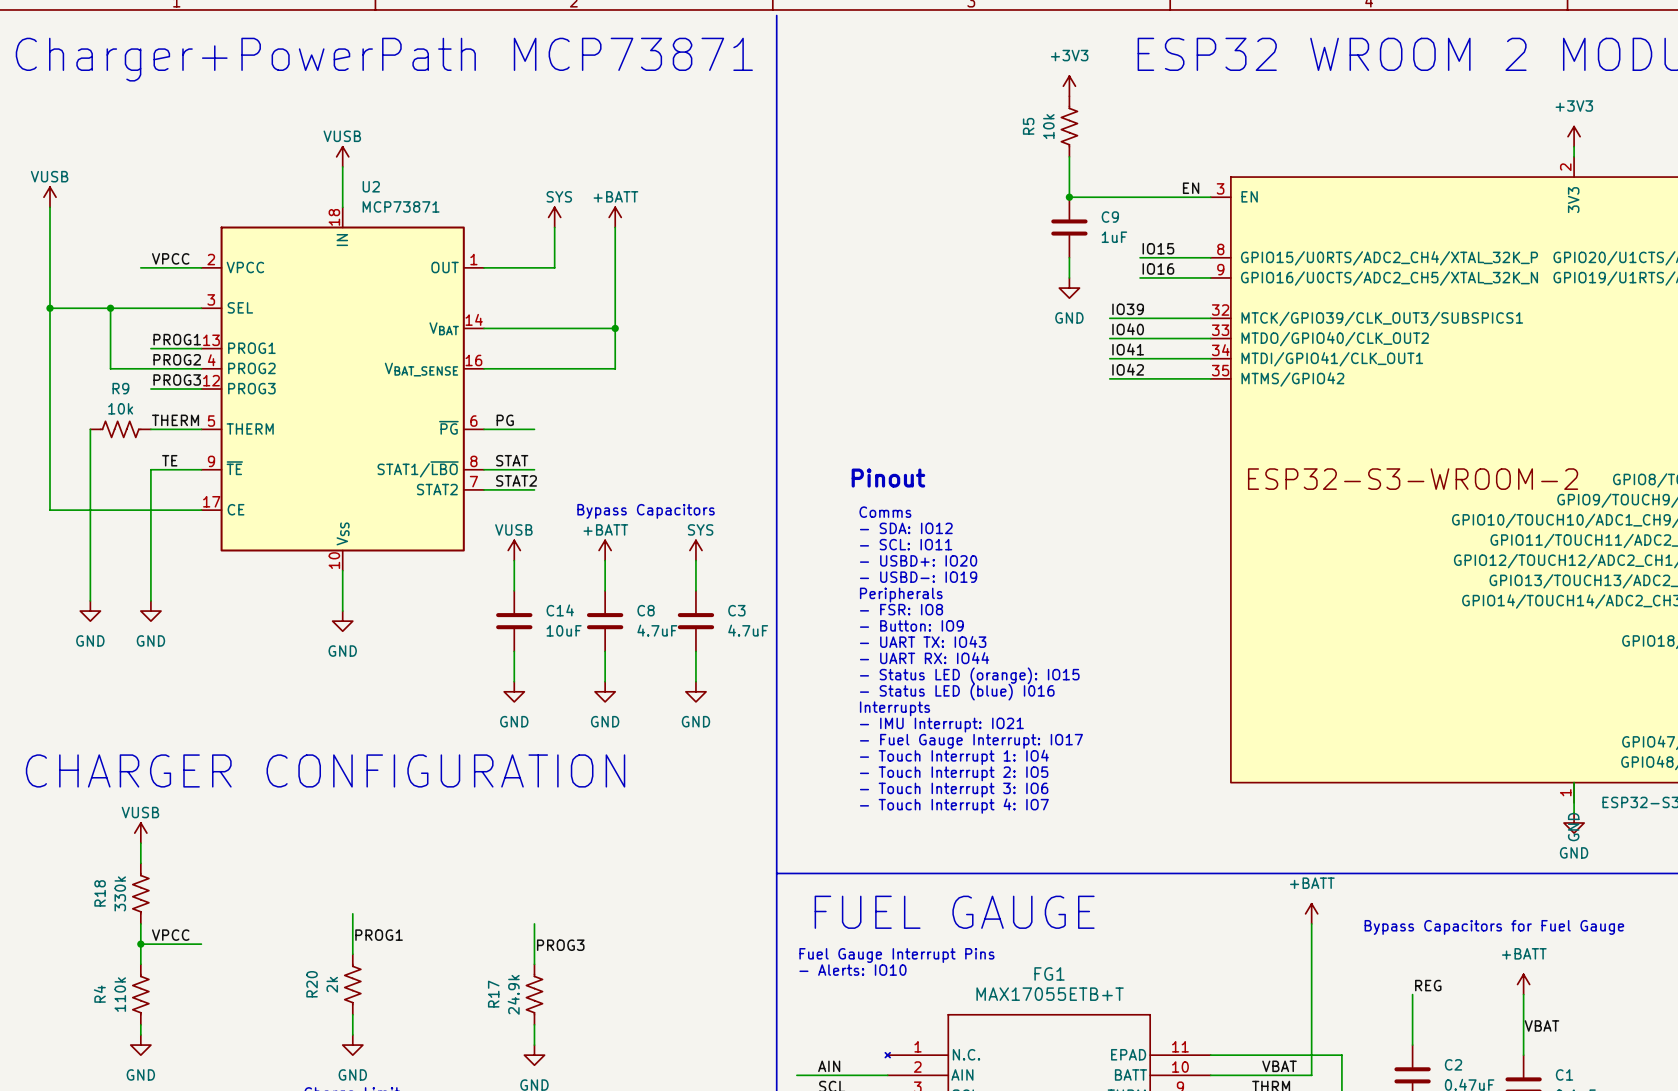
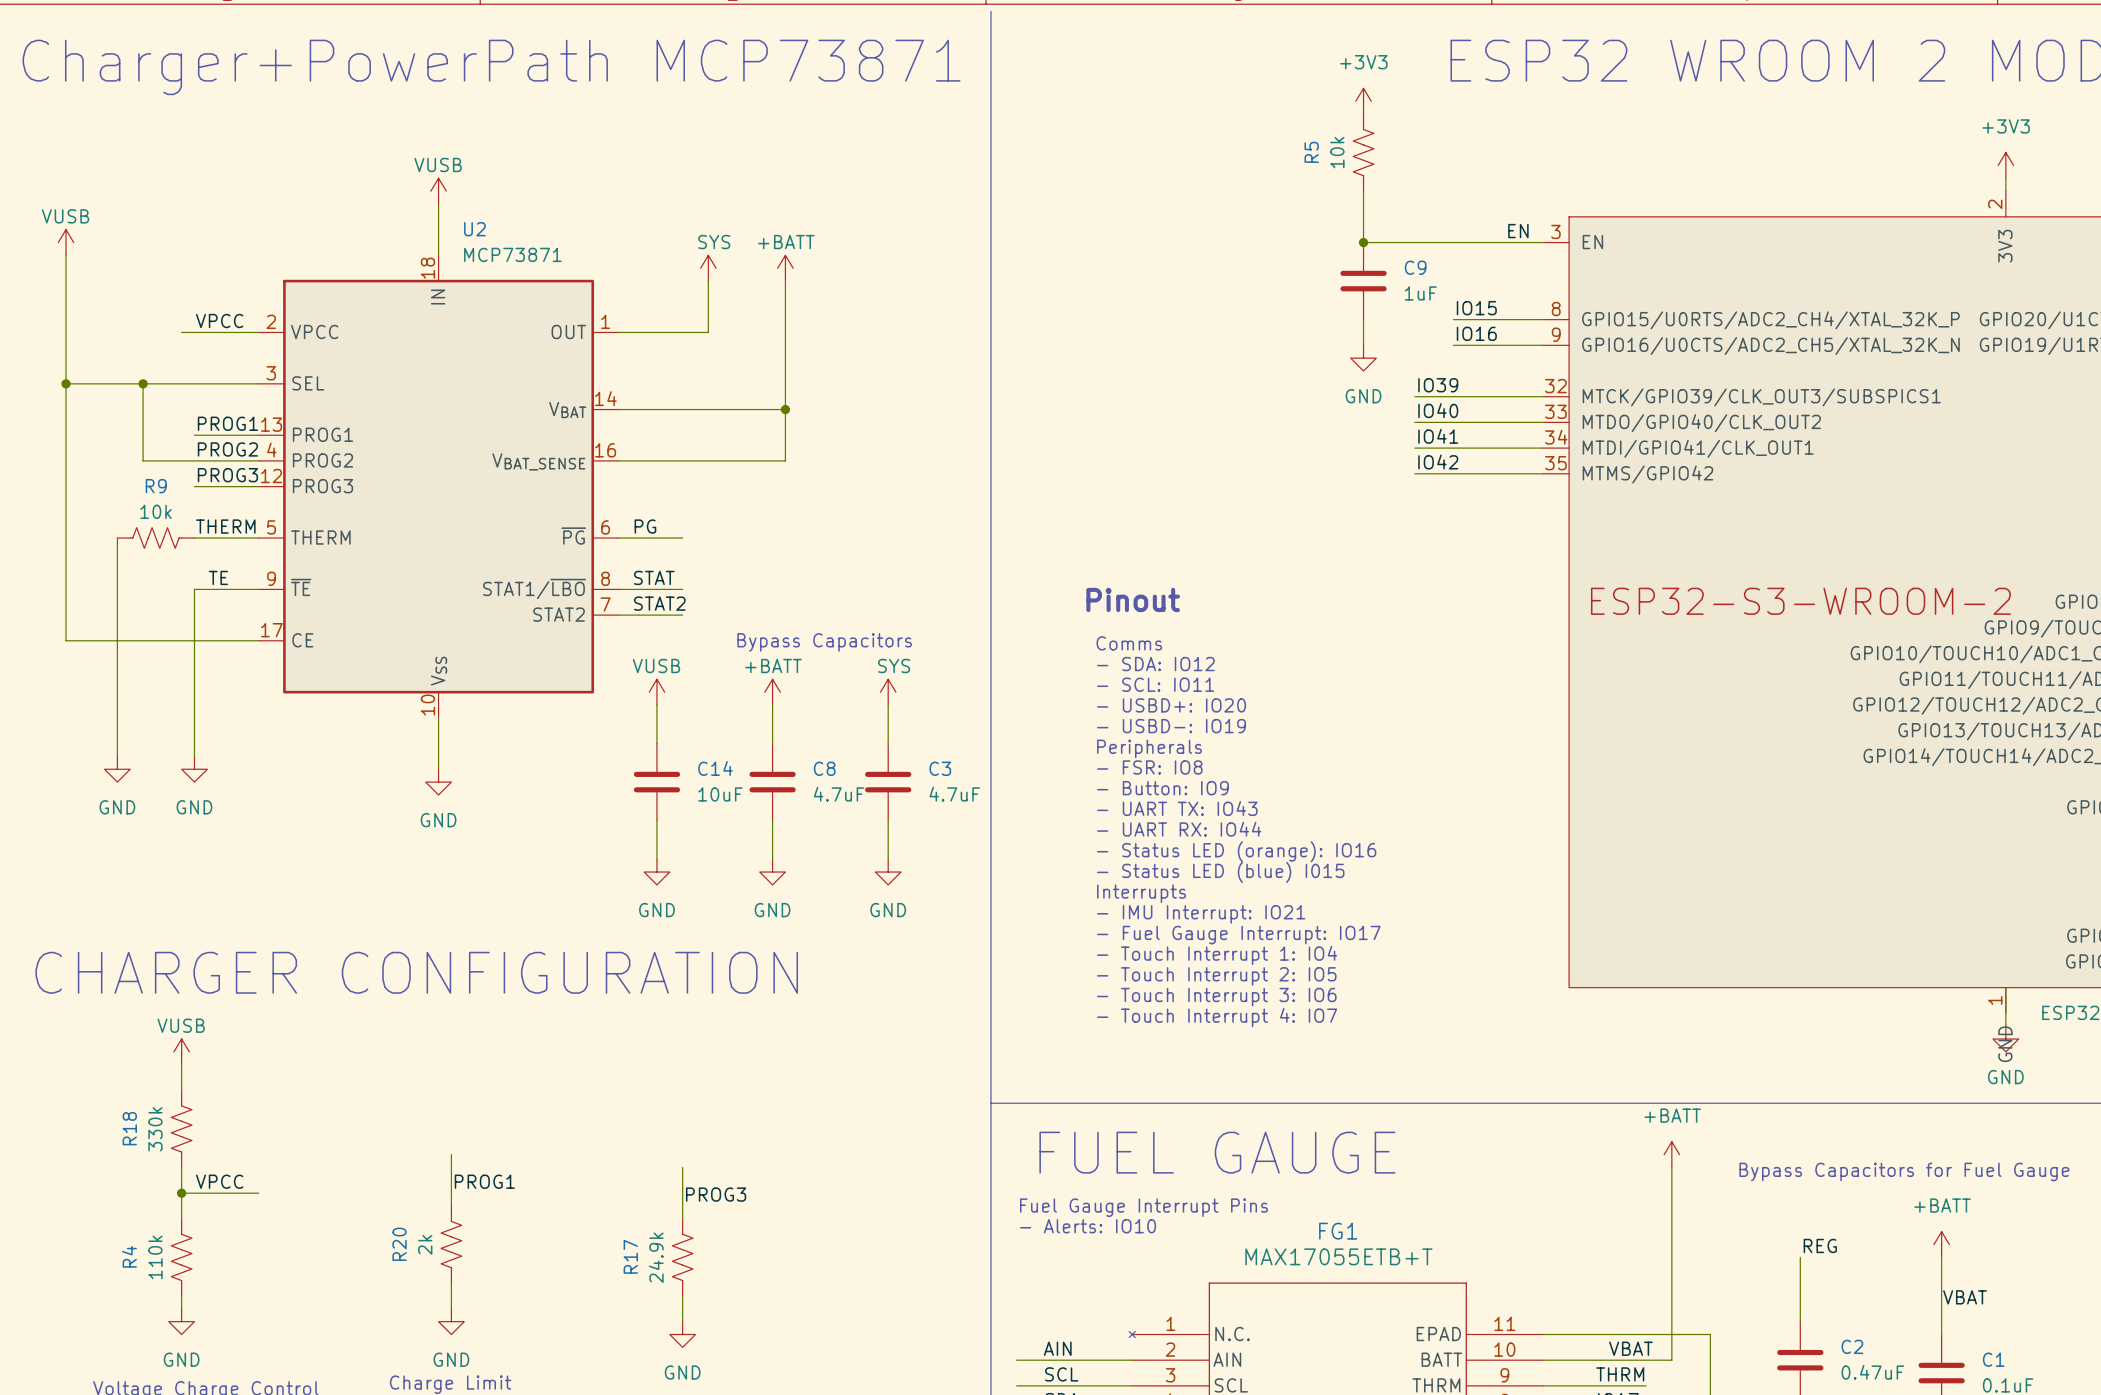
text: - Status LED (orange): IO15 (969, 675) -> - Status LED (orange): IO16 (1236, 851)
text: - Status LED (blue) I016 (957, 692) -> - Status LED (blue) I015 (1220, 872)

